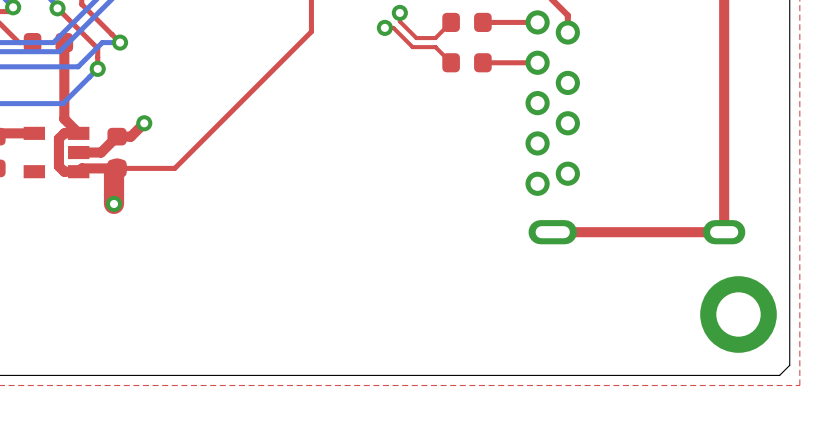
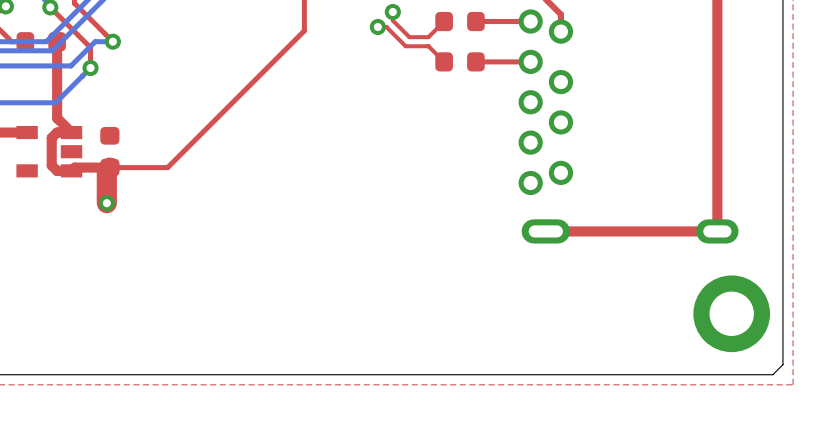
top track: (144, 123) (130, 136) (117, 136) (101, 152) (78, 152) -> none
via: (144, 123) -> none

